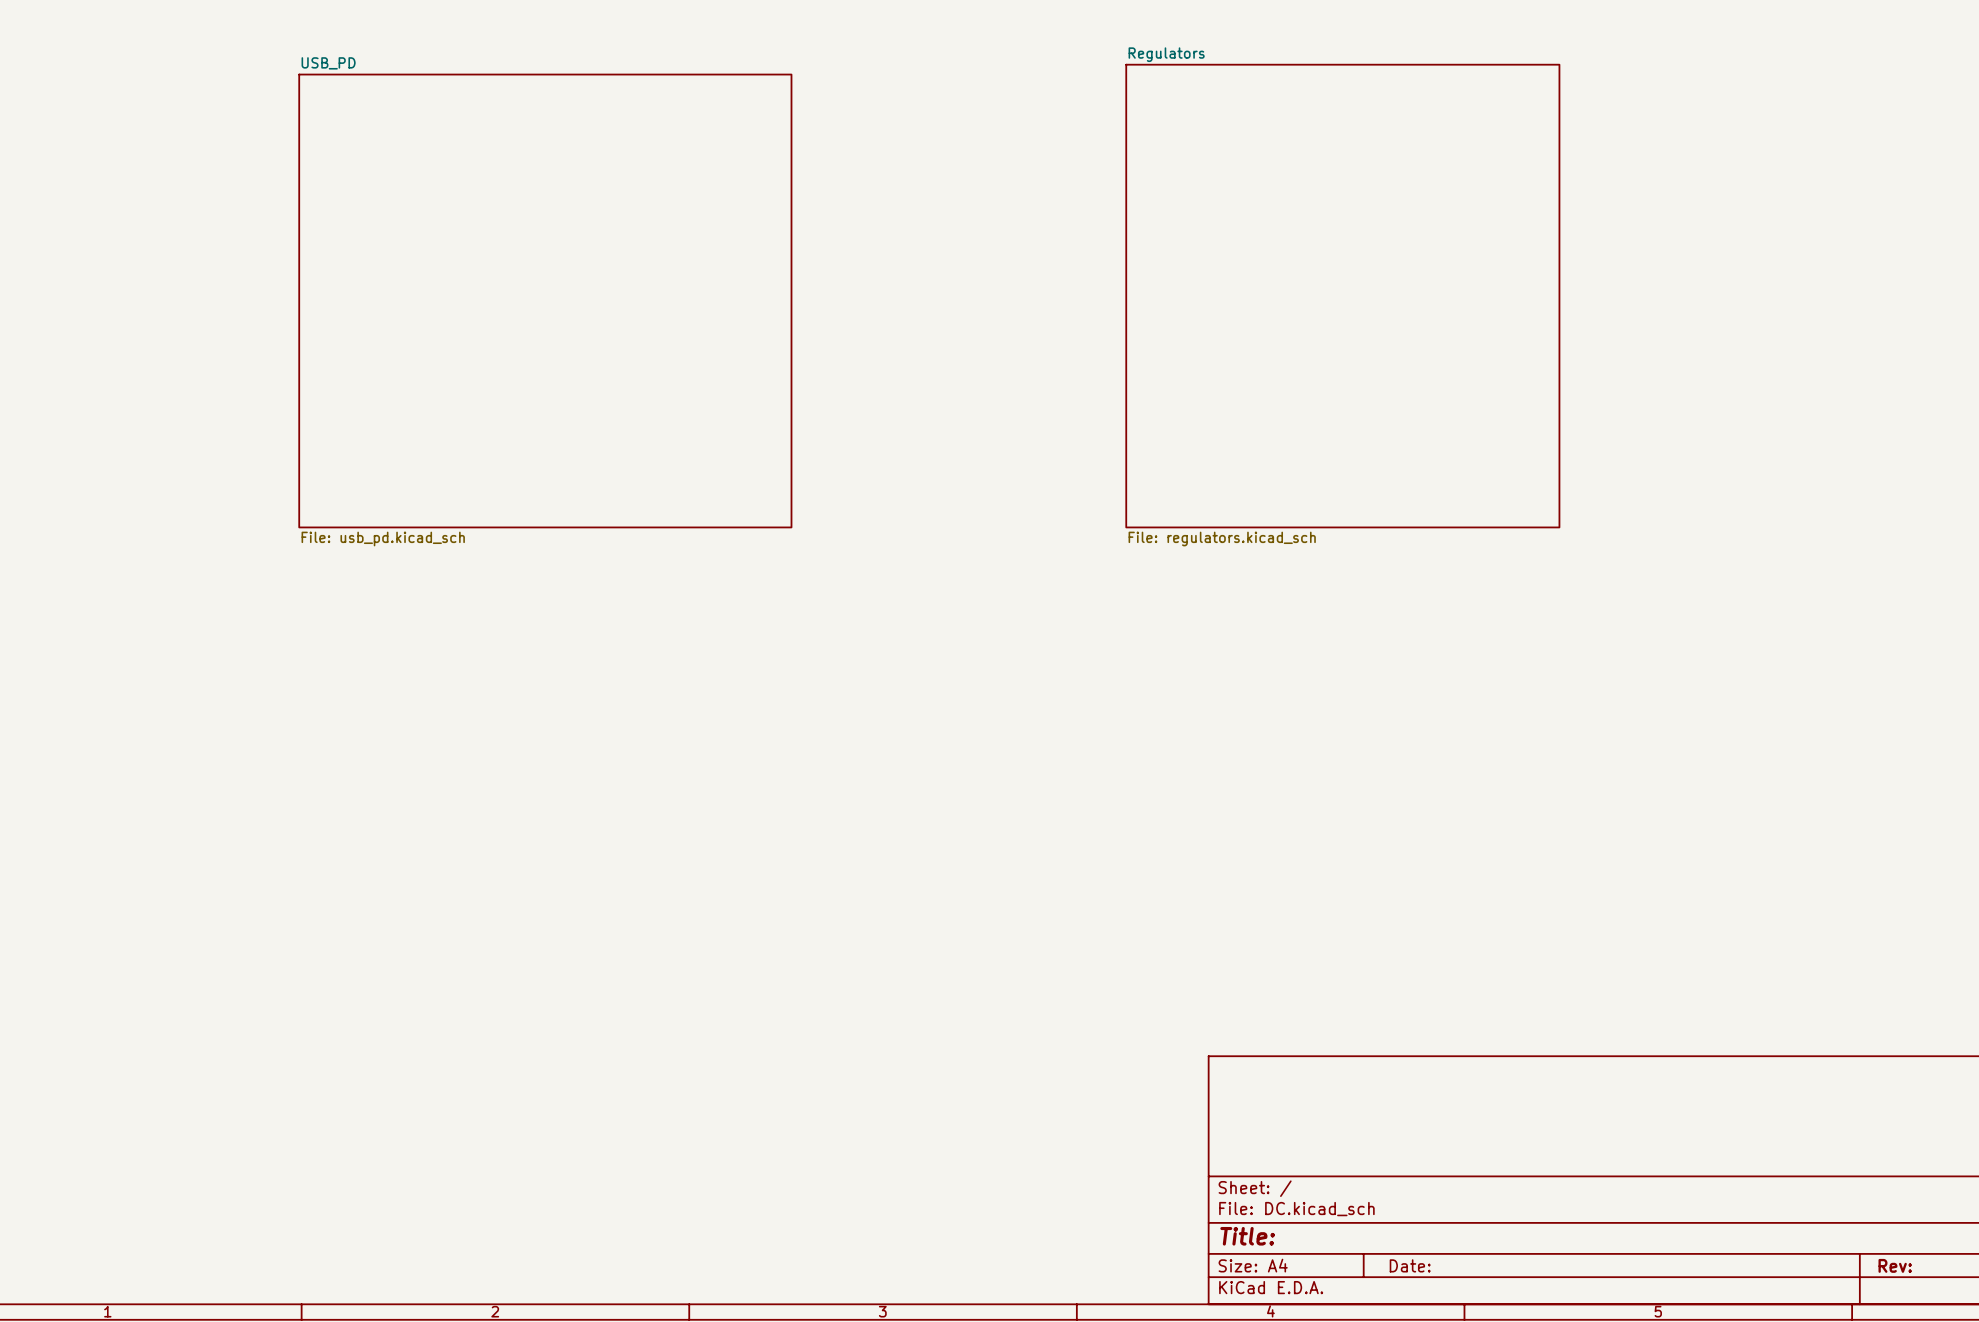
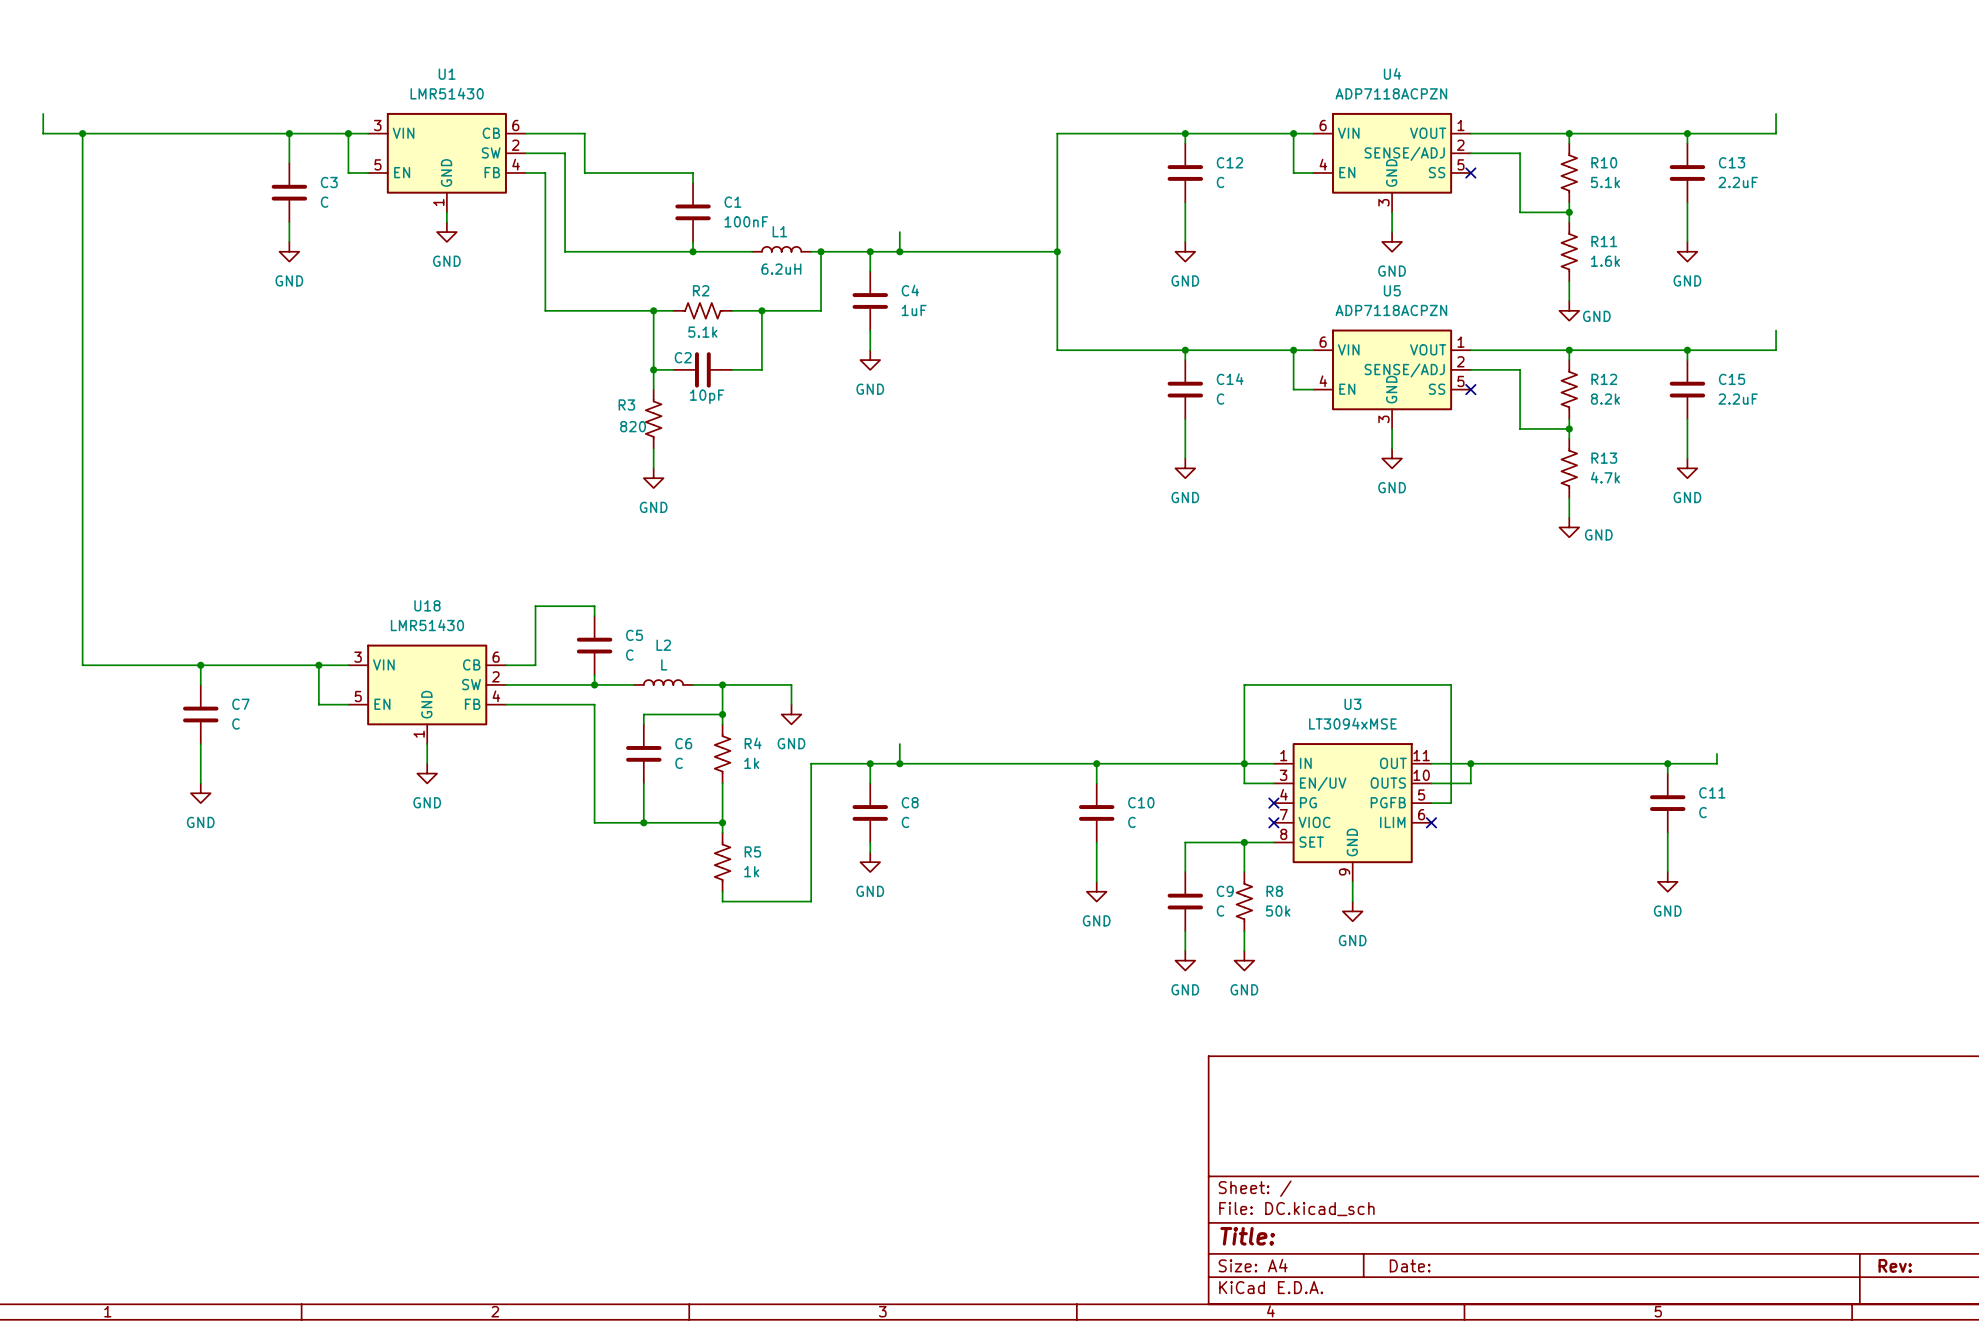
wire: none -> (43, 113) (43, 133) (368, 133)
wire: none -> (1776, 113) (1776, 133) (1470, 133)
wire: none -> (82, 133) (82, 665) (348, 665)
junction: none -> (82, 133)
wire: none -> (289, 133) (289, 163)
junction: none -> (289, 133)
wire: none -> (348, 133) (348, 173) (368, 173)
junction: none -> (348, 133)
wire: none -> (525, 133) (584, 133) (584, 173) (693, 173) (693, 182)
wire: none -> (1185, 133) (1185, 143)
junction: none -> (1185, 133)
wire: none -> (1293, 133) (1293, 173) (1313, 173)
junction: none -> (1293, 133)
wire: none -> (1313, 133) (1057, 133) (1057, 350) (1313, 350)
wire: none -> (1569, 133) (1569, 143)
junction: none -> (1569, 133)
wire: none -> (1687, 133) (1687, 143)
junction: none -> (1687, 133)
wire: none -> (525, 153) (565, 153) (565, 251) (752, 251)
wire: none -> (1470, 153) (1520, 153) (1520, 212) (1569, 212)
U1: none -> LMR51430 (446, 162)
U4: none -> ADP7118ACPZN (1392, 162)
wire: none -> (525, 173) (545, 173) (545, 310) (673, 310)
C12: none -> C (1185, 173)
no-connect mark: none -> (1470, 173)
R10: none -> 5.1k (1569, 173)
C13: none -> 2.2uF (1687, 173)
C3: none -> C (289, 192)
wire: none -> (1185, 202) (1185, 241)
wire: none -> (1569, 202) (1569, 222)
wire: none -> (1687, 202) (1687, 241)
wire: none -> (446, 212) (446, 222)
C1: none -> 100nF (693, 212)
wire: none -> (1392, 212) (1392, 232)
junction: none -> (1569, 212)
wire: none -> (289, 222) (289, 241)
power symbol: none -> GND (446, 232)
wire: none -> (899, 232) (899, 251)
wire: none -> (693, 241) (693, 251)
power symbol: none -> GND (1392, 241)
L1: none -> 6.2uH (781, 249)
power symbol: none -> GND (289, 251)
junction: none -> (693, 251)
wire: none -> (811, 251) (1057, 251)
wire: none -> (821, 251) (821, 310) (732, 310)
junction: none -> (821, 251)
wire: none -> (870, 251) (870, 271)
junction: none -> (870, 251)
junction: none -> (899, 251)
junction: none -> (1057, 251)
power symbol: none -> GND (1185, 251)
R11: none -> 1.6k (1569, 251)
power symbol: none -> GND (1687, 251)
wire: none -> (1569, 281) (1569, 300)
sheet Regulators: File: regulators.kicad_sch (1342, 296) -> none
sheet USB_PD: File: usb_pd.kicad_sch (545, 300) -> none
C4: none -> 1uF (870, 300)
wire: none -> (653, 310) (653, 389)
junction: none -> (653, 310)
R2: none -> 5.1k (702, 310)
wire: none -> (761, 310) (761, 369) (732, 369)
junction: none -> (761, 310)
power symbol: none -> GND (1569, 310)
wire: none -> (870, 330) (870, 350)
wire: none -> (1776, 330) (1776, 350) (1470, 350)
wire: none -> (1185, 350) (1185, 360)
junction: none -> (1185, 350)
wire: none -> (1293, 350) (1293, 389) (1313, 389)
junction: none -> (1293, 350)
wire: none -> (1569, 350) (1569, 360)
junction: none -> (1569, 350)
wire: none -> (1687, 350) (1687, 360)
junction: none -> (1687, 350)
power symbol: none -> GND (870, 360)
wire: none -> (653, 369) (673, 369)
junction: none -> (653, 369)
C2: none -> 10pF (702, 369)
wire: none -> (1470, 369) (1520, 369) (1520, 428) (1569, 428)
U5: none -> ADP7118ACPZN (1392, 379)
C14: none -> C (1185, 389)
no-connect mark: none -> (1470, 389)
R12: none -> 8.2k (1569, 389)
C15: none -> 2.2uF (1687, 389)
R3: none -> 820 (653, 419)
wire: none -> (1185, 419) (1185, 458)
wire: none -> (1569, 419) (1569, 438)
wire: none -> (1687, 419) (1687, 458)
wire: none -> (1392, 428) (1392, 448)
junction: none -> (1569, 428)
wire: none -> (653, 448) (653, 468)
power symbol: none -> GND (1392, 458)
power symbol: none -> GND (1185, 468)
R13: none -> 4.7k (1569, 468)
power symbol: none -> GND (1687, 468)
power symbol: none -> GND (653, 478)
wire: none -> (1569, 497) (1569, 517)
power symbol: none -> GND (1569, 527)
wire: none -> (594, 616) (594, 606) (535, 606) (535, 665) (505, 665)
C5: none -> C (594, 645)
wire: none -> (200, 665) (200, 684)
junction: none -> (200, 665)
wire: none -> (318, 665) (318, 704) (348, 704)
junction: none -> (318, 665)
wire: none -> (594, 675) (594, 684)
L2: none -> L (663, 682)
wire: none -> (505, 684) (633, 684)
junction: none -> (594, 684)
wire: none -> (693, 684) (791, 684) (791, 704)
wire: none -> (722, 684) (722, 724)
junction: none -> (722, 684)
U18: none -> LMR51430 (427, 694)
wire: none -> (505, 704) (594, 704) (594, 822) (722, 822)
C7: none -> C (200, 714)
wire: none -> (722, 714) (643, 714) (643, 724)
junction: none -> (722, 714)
power symbol: none -> GND (791, 714)
wire: none -> (200, 744) (200, 783)
wire: none -> (427, 744) (427, 763)
wire: none -> (899, 744) (899, 763)
C6: none -> C (643, 753)
R4: none -> 1k (722, 753)
wire: none -> (1716, 753) (1716, 763) (1431, 763)
wire: none -> (870, 763) (870, 783)
junction: none -> (870, 763)
junction: none -> (899, 763)
wire: none -> (1096, 763) (1096, 783)
junction: none -> (1096, 763)
junction: none -> (1244, 763)
wire: none -> (1273, 763) (811, 763) (811, 901) (722, 901) (722, 891)
wire: none -> (1470, 763) (1470, 783) (1431, 783)
junction: none -> (1470, 763)
wire: none -> (1667, 763) (1667, 773)
junction: none -> (1667, 763)
power symbol: none -> GND (427, 773)
wire: none -> (643, 783) (643, 822)
wire: none -> (722, 783) (722, 832)
wire: none -> (1273, 783) (1244, 783) (1244, 684) (1451, 684) (1451, 803) (1431, 803)
power symbol: none -> GND (200, 793)
no-connect mark: none -> (1273, 803)
C11: none -> C (1667, 803)
C8: none -> C (870, 812)
C10: none -> C (1096, 812)
U3: none -> LT3094xMSE (1352, 812)
junction: none -> (643, 822)
junction: none -> (722, 822)
no-connect mark: none -> (1273, 822)
no-connect mark: none -> (1431, 822)
wire: none -> (1667, 832) (1667, 872)
wire: none -> (870, 842) (870, 852)
wire: none -> (1096, 842) (1096, 881)
wire: none -> (1244, 842) (1244, 872)
junction: none -> (1244, 842)
wire: none -> (1273, 842) (1185, 842) (1185, 872)
R5: none -> 1k (722, 862)
power symbol: none -> GND (870, 862)
wire: none -> (1352, 881) (1352, 901)
power symbol: none -> GND (1667, 881)
power symbol: none -> GND (1096, 891)
C9: none -> C (1185, 901)
R8: none -> 50k (1244, 901)
power symbol: none -> GND (1352, 911)
wire: none -> (1185, 931) (1185, 950)
wire: none -> (1244, 931) (1244, 950)
power symbol: none -> GND (1185, 960)
power symbol: none -> GND (1244, 960)

